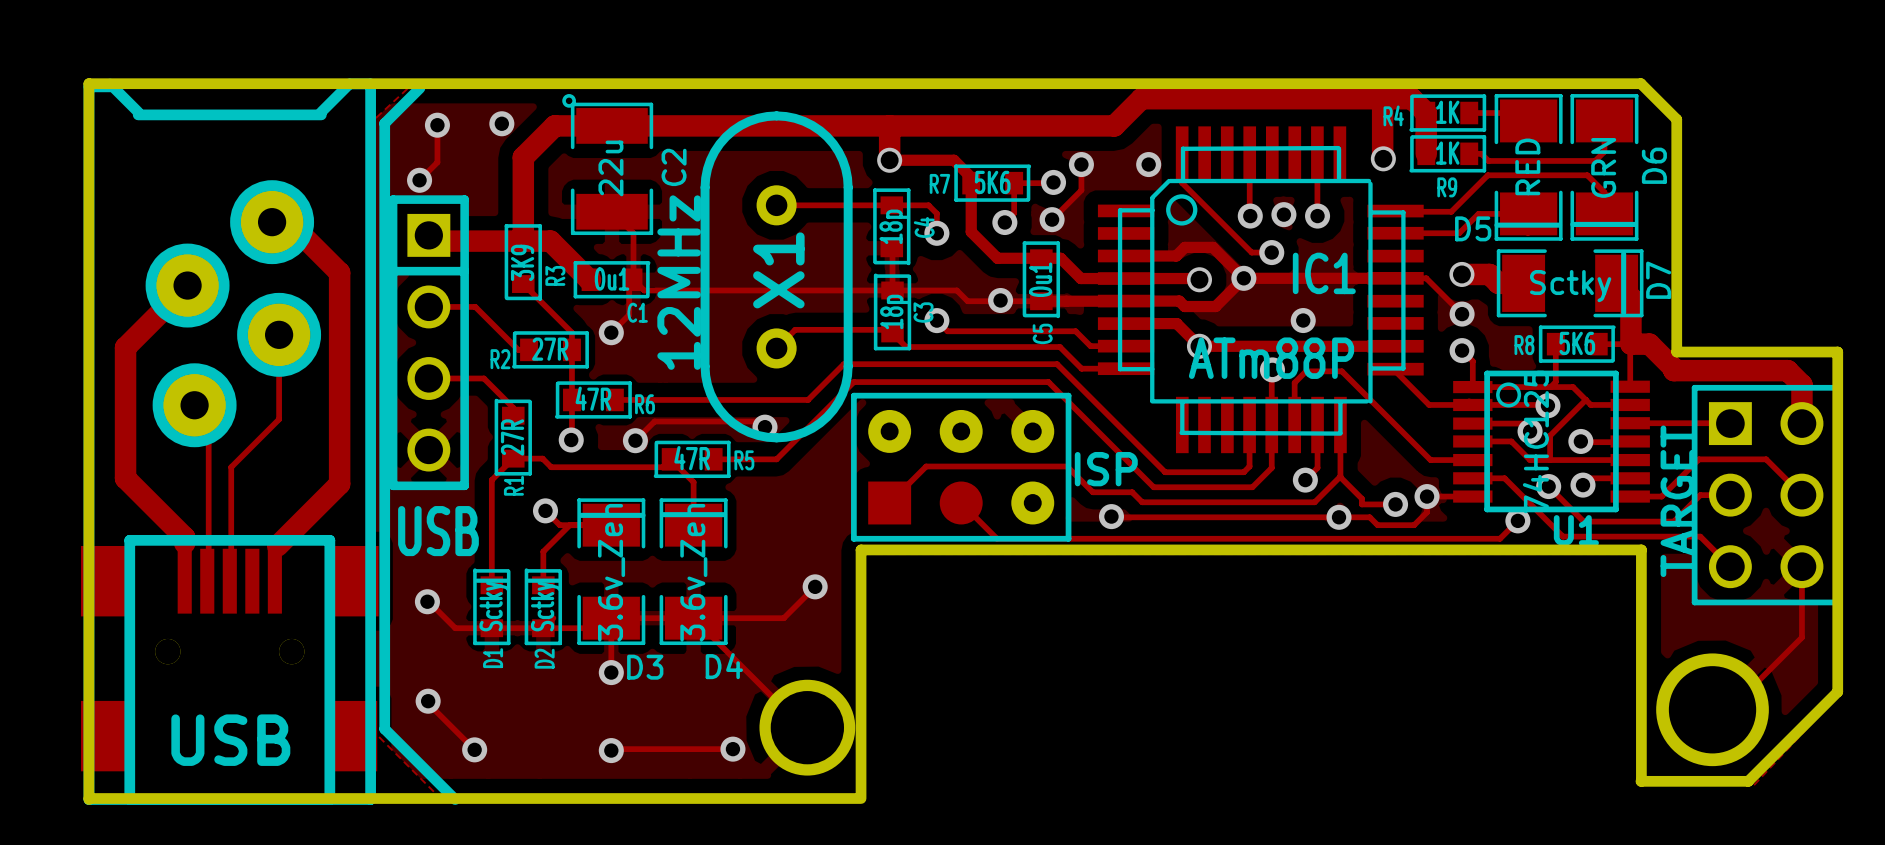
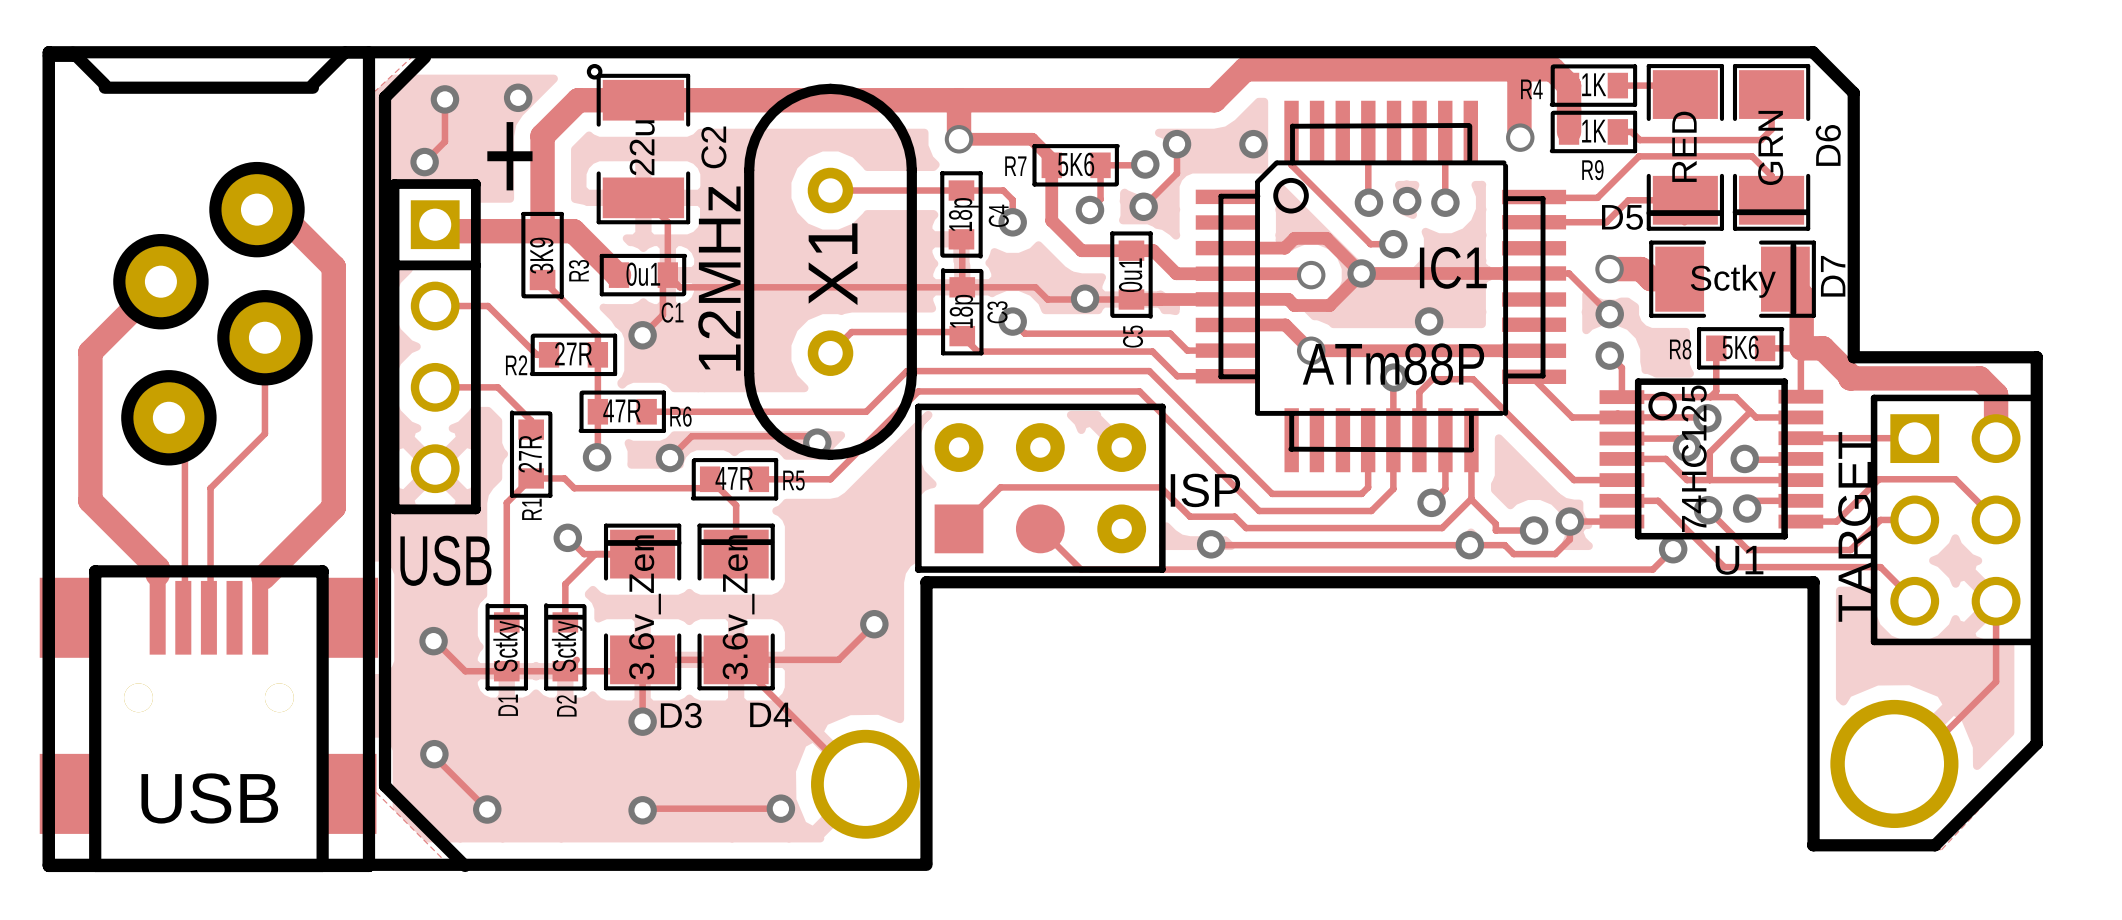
text: none -> + (509, 156)

